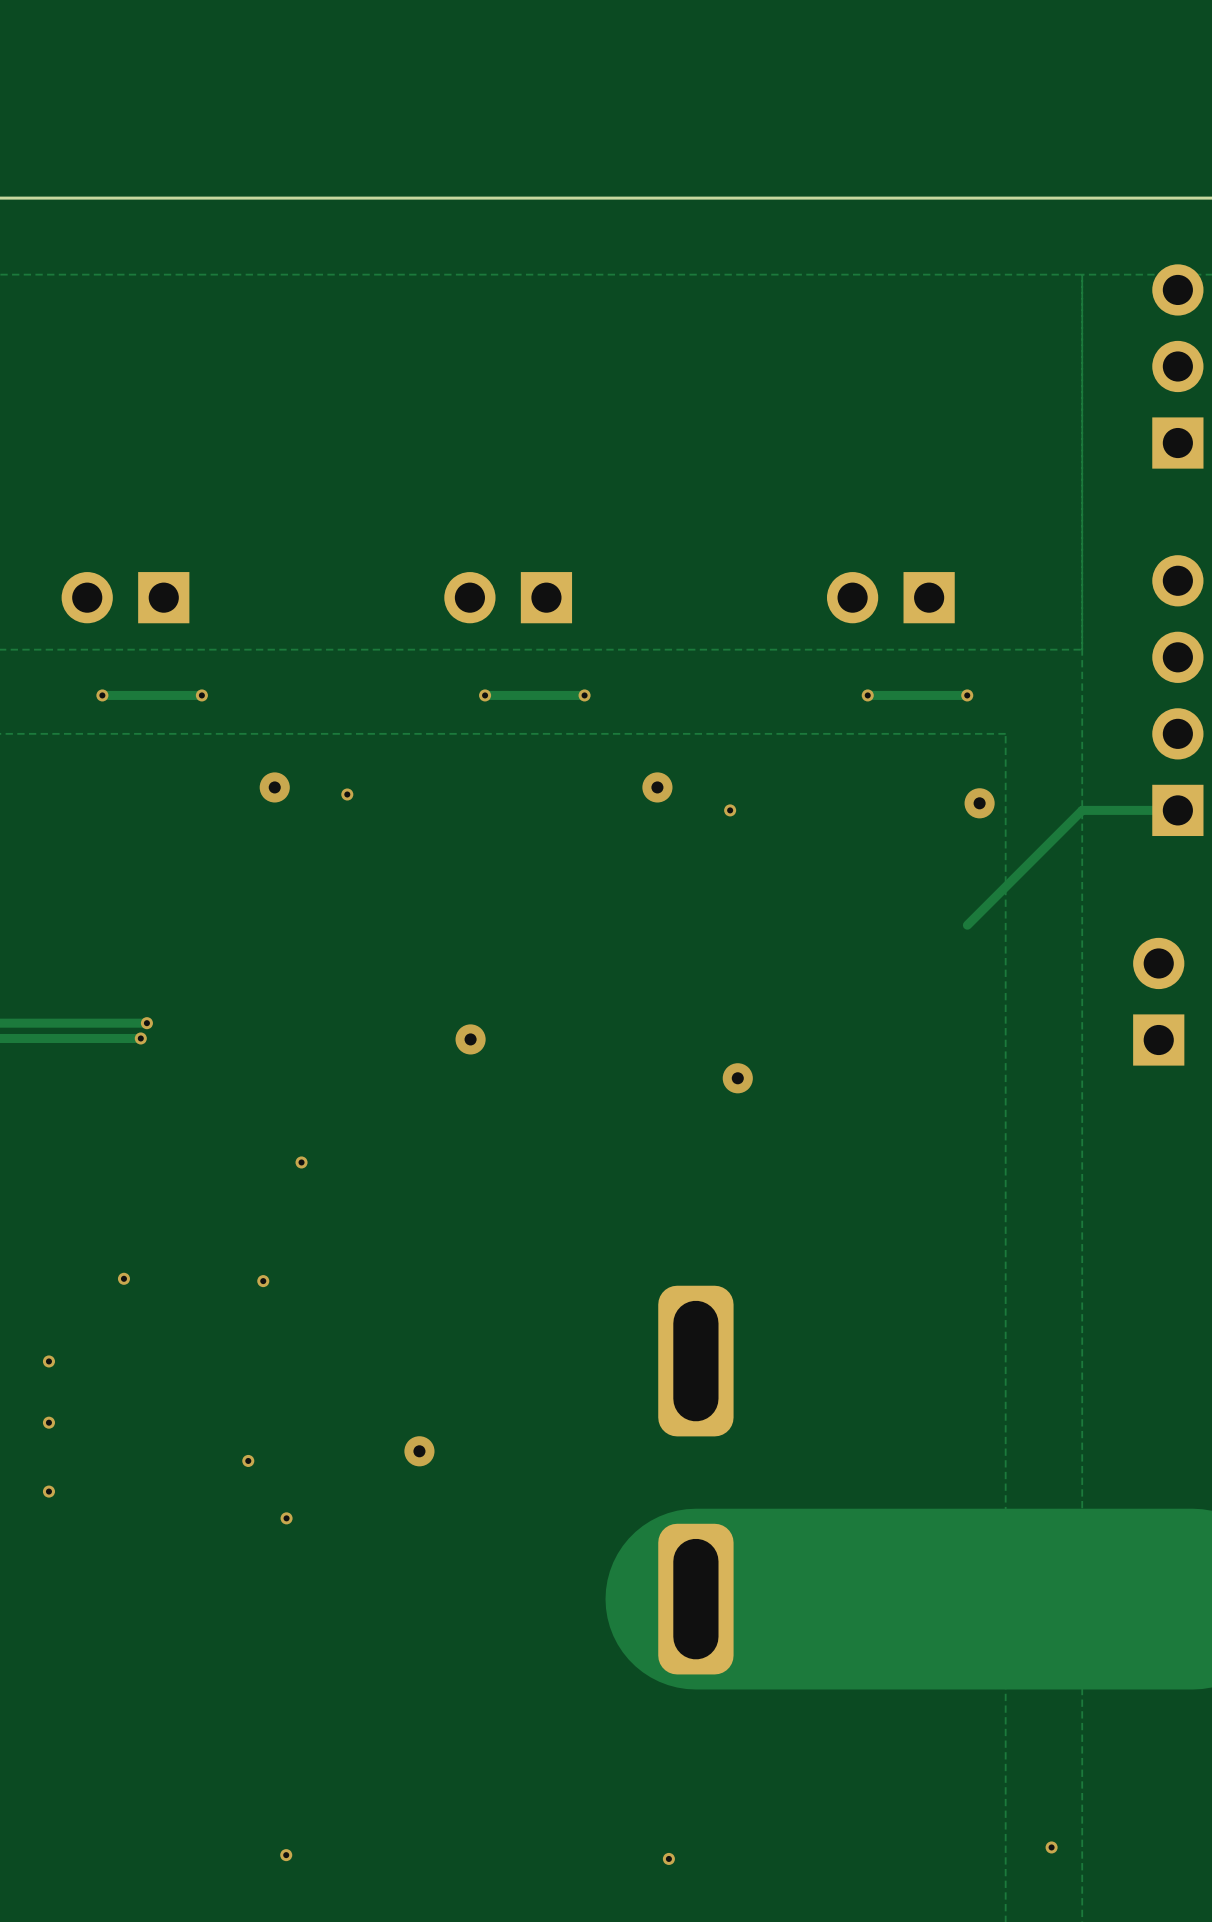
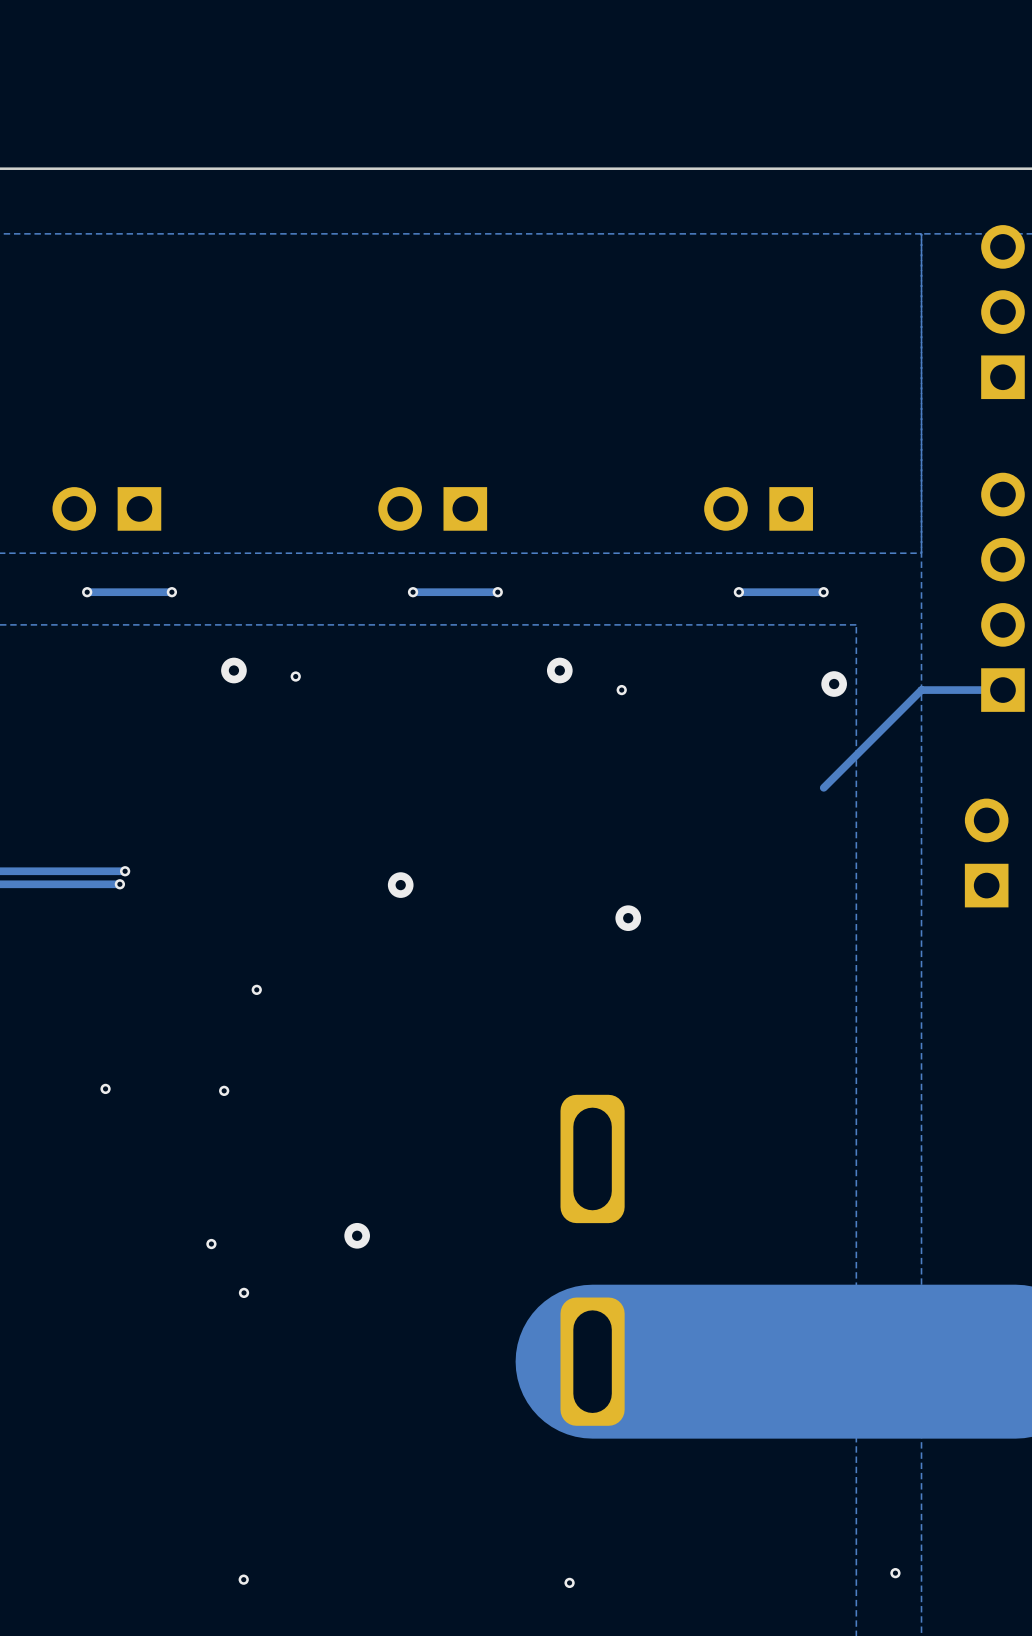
via: (48, 1361) -> none
via: (48, 1422) -> none
via: (48, 1491) -> none

